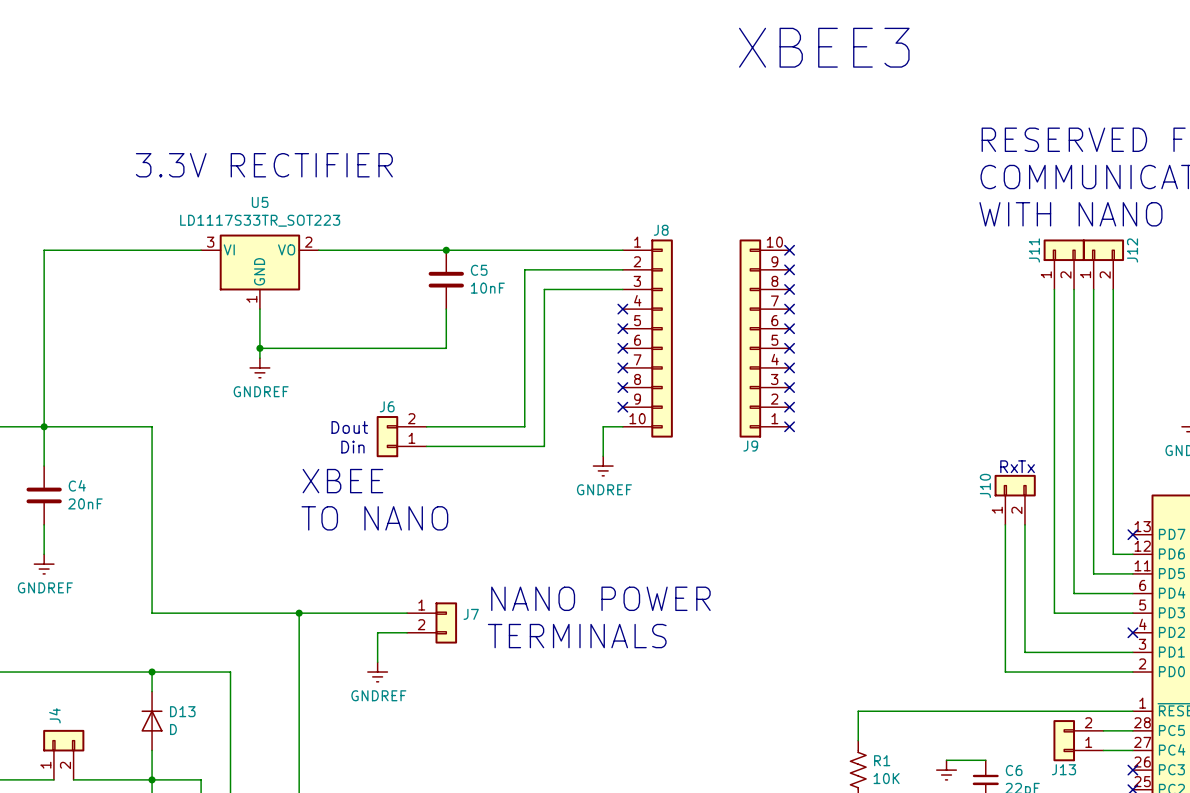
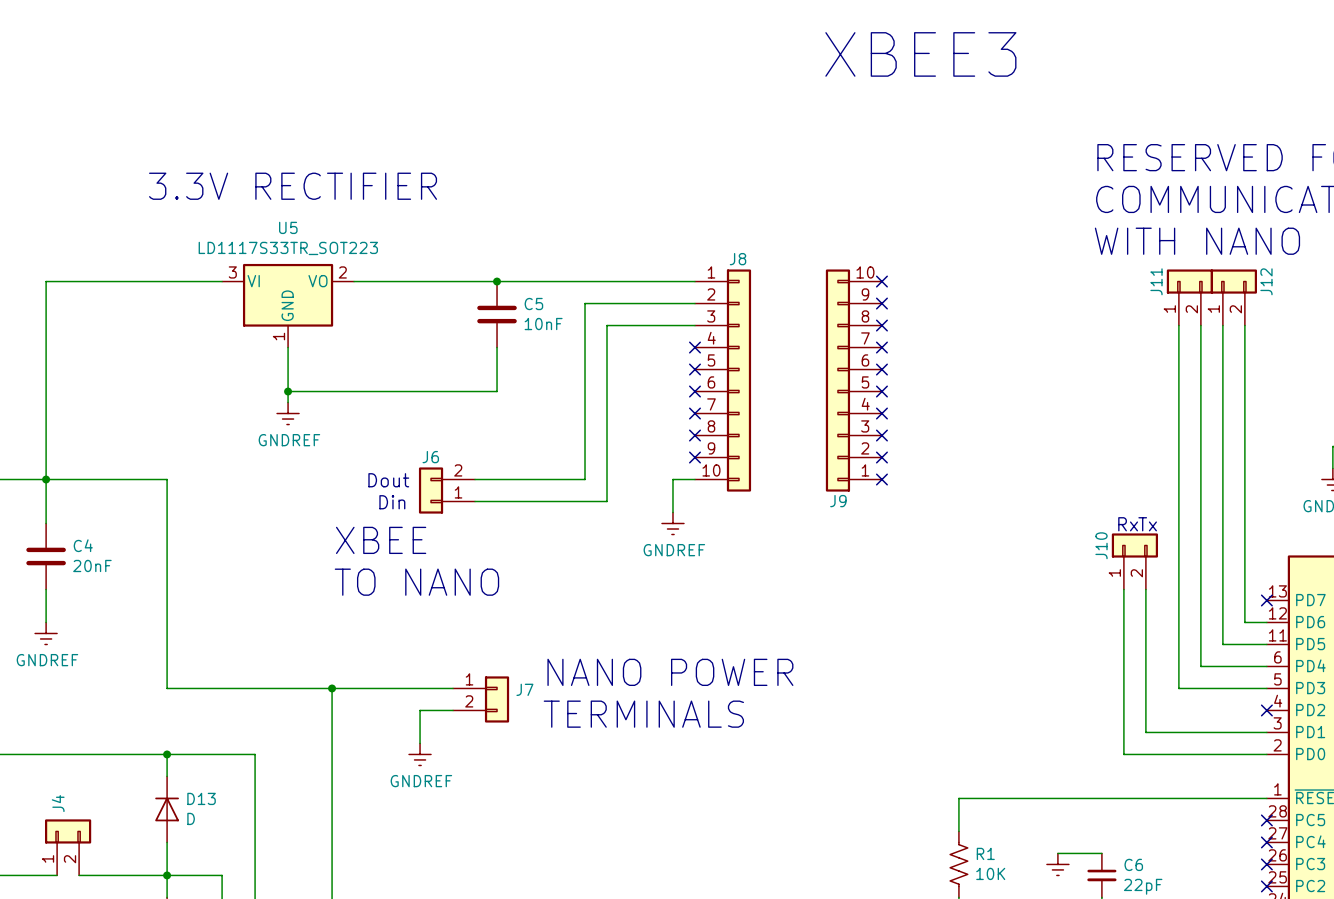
wire: (1103, 730) (1132, 730) -> none
no-connect mark: none -> (1266, 820)
J13: (1078, 740) -> none
wire: (1103, 750) (1132, 750) -> none
no-connect mark: none -> (1266, 842)

